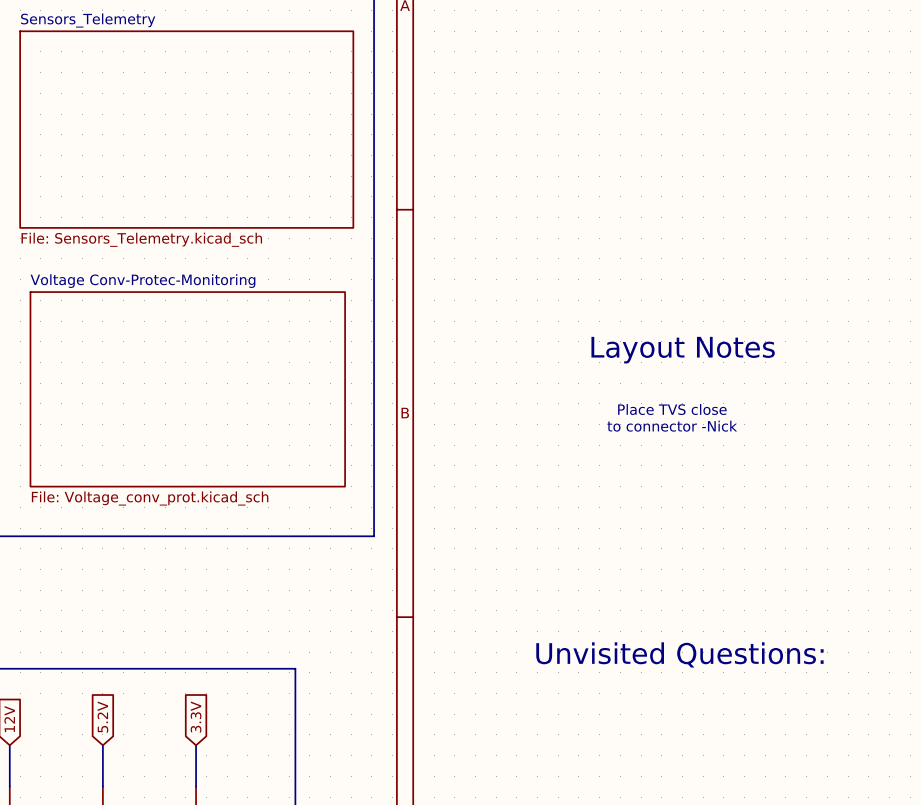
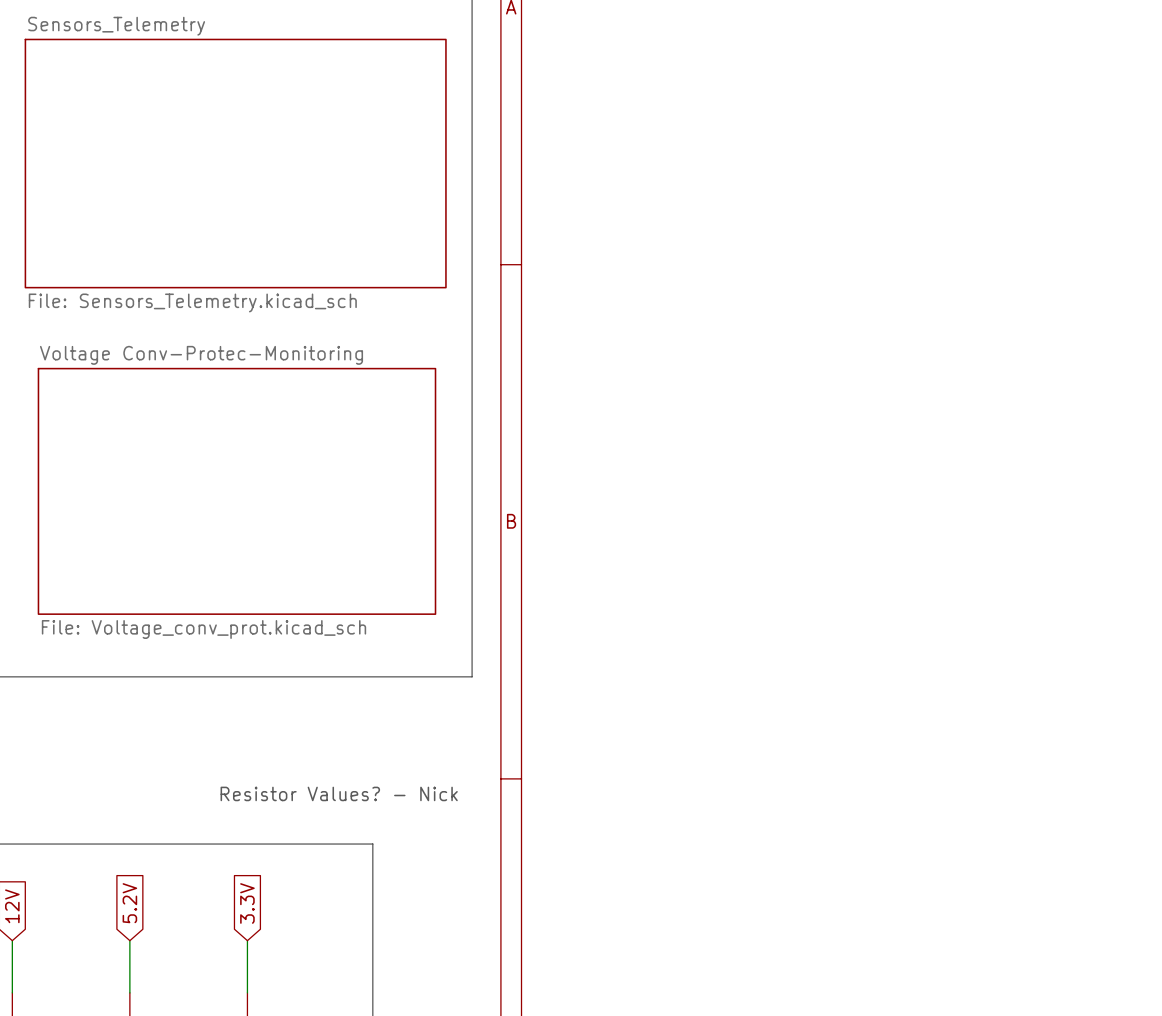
text: Layout Notes (683, 350) -> none
text: Place TVS close (672, 409) -> none
text: to connector -Nick (672, 426) -> none
text: none -> Resistor Values? - Nick (339, 793)
text: Unvisited Questions: (679, 654) -> none

